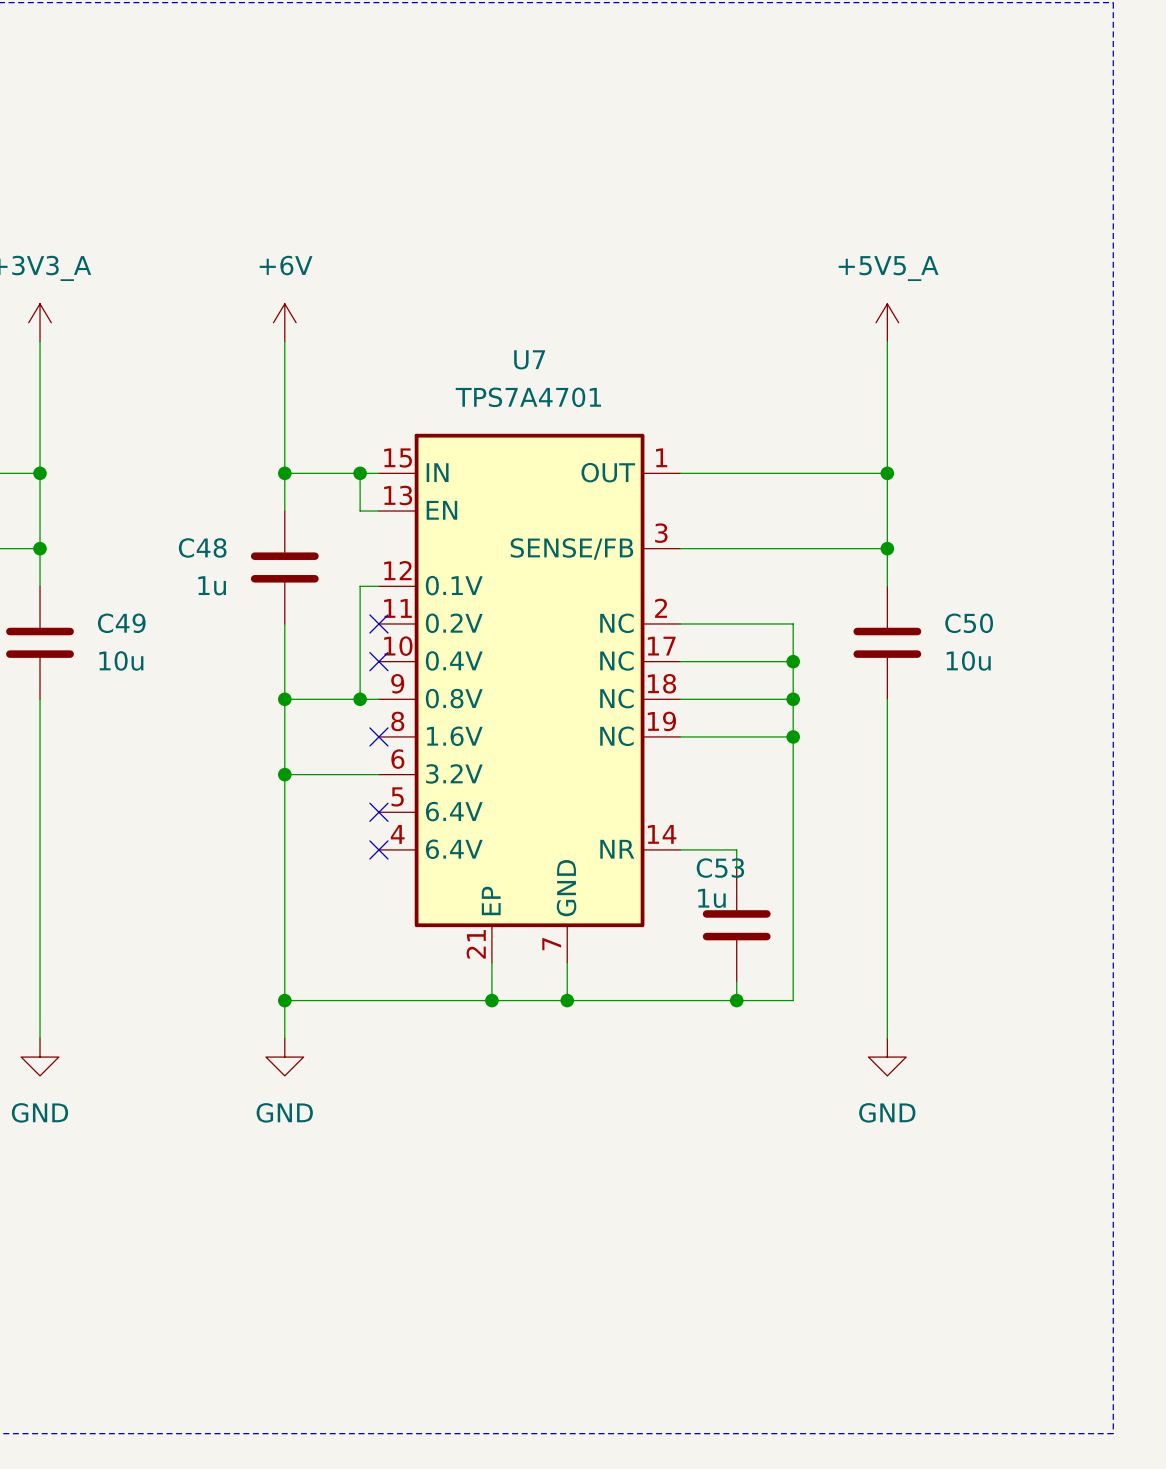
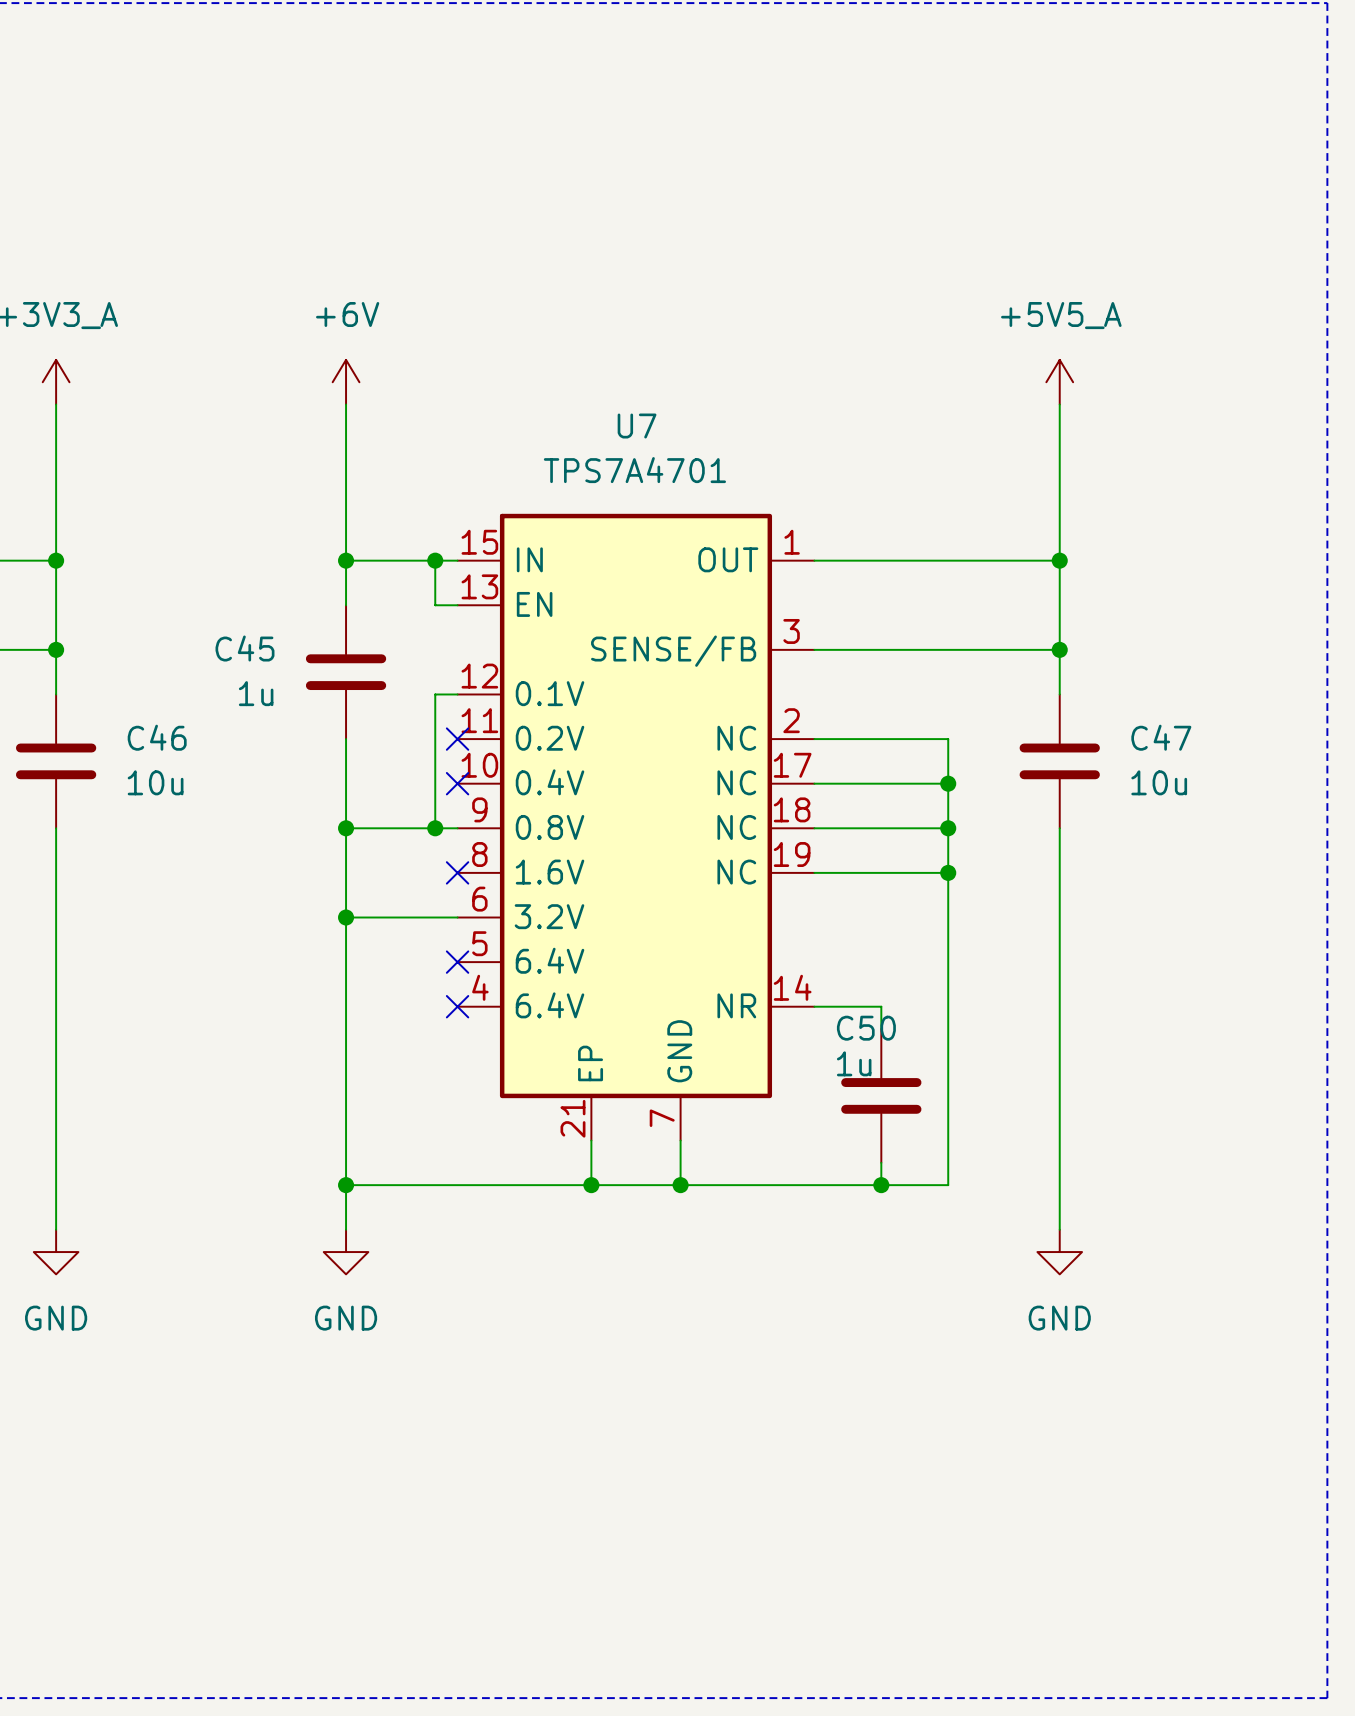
C48 name: C48 (202, 547) -> C45 (244, 648)
C49 name: C49 (121, 623) -> C46 (157, 737)
C50 name: C50 (969, 623) -> C47 (1161, 737)
C53 name: C53 (720, 868) -> C50 (866, 1028)

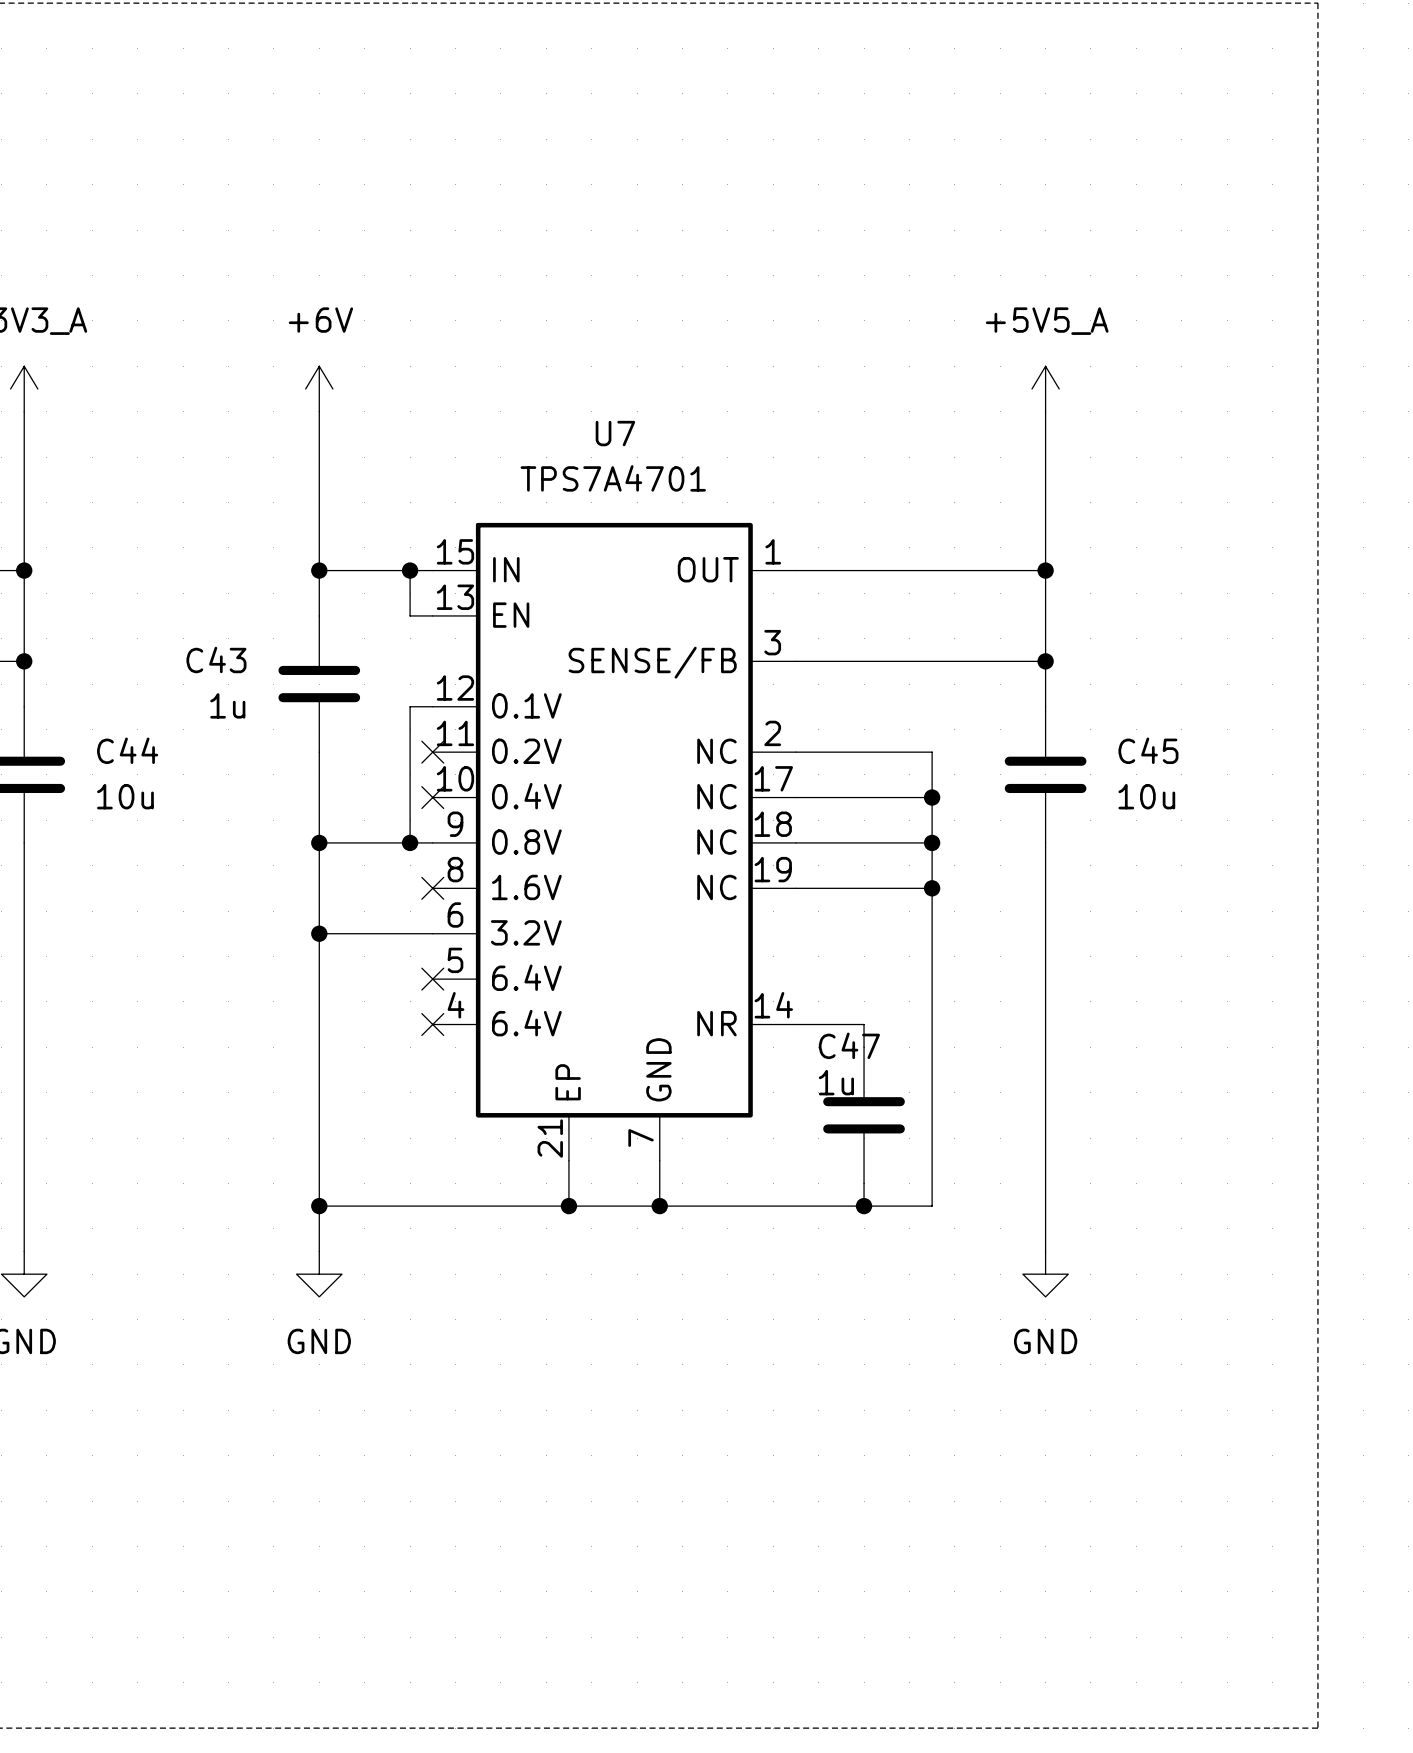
C45 name: C45 (244, 648) -> C43 (216, 659)
C46 name: C46 (157, 737) -> C44 (127, 750)
C47 name: C47 (1161, 737) -> C45 (1148, 750)
C50 name: C50 (866, 1028) -> C47 (849, 1045)

